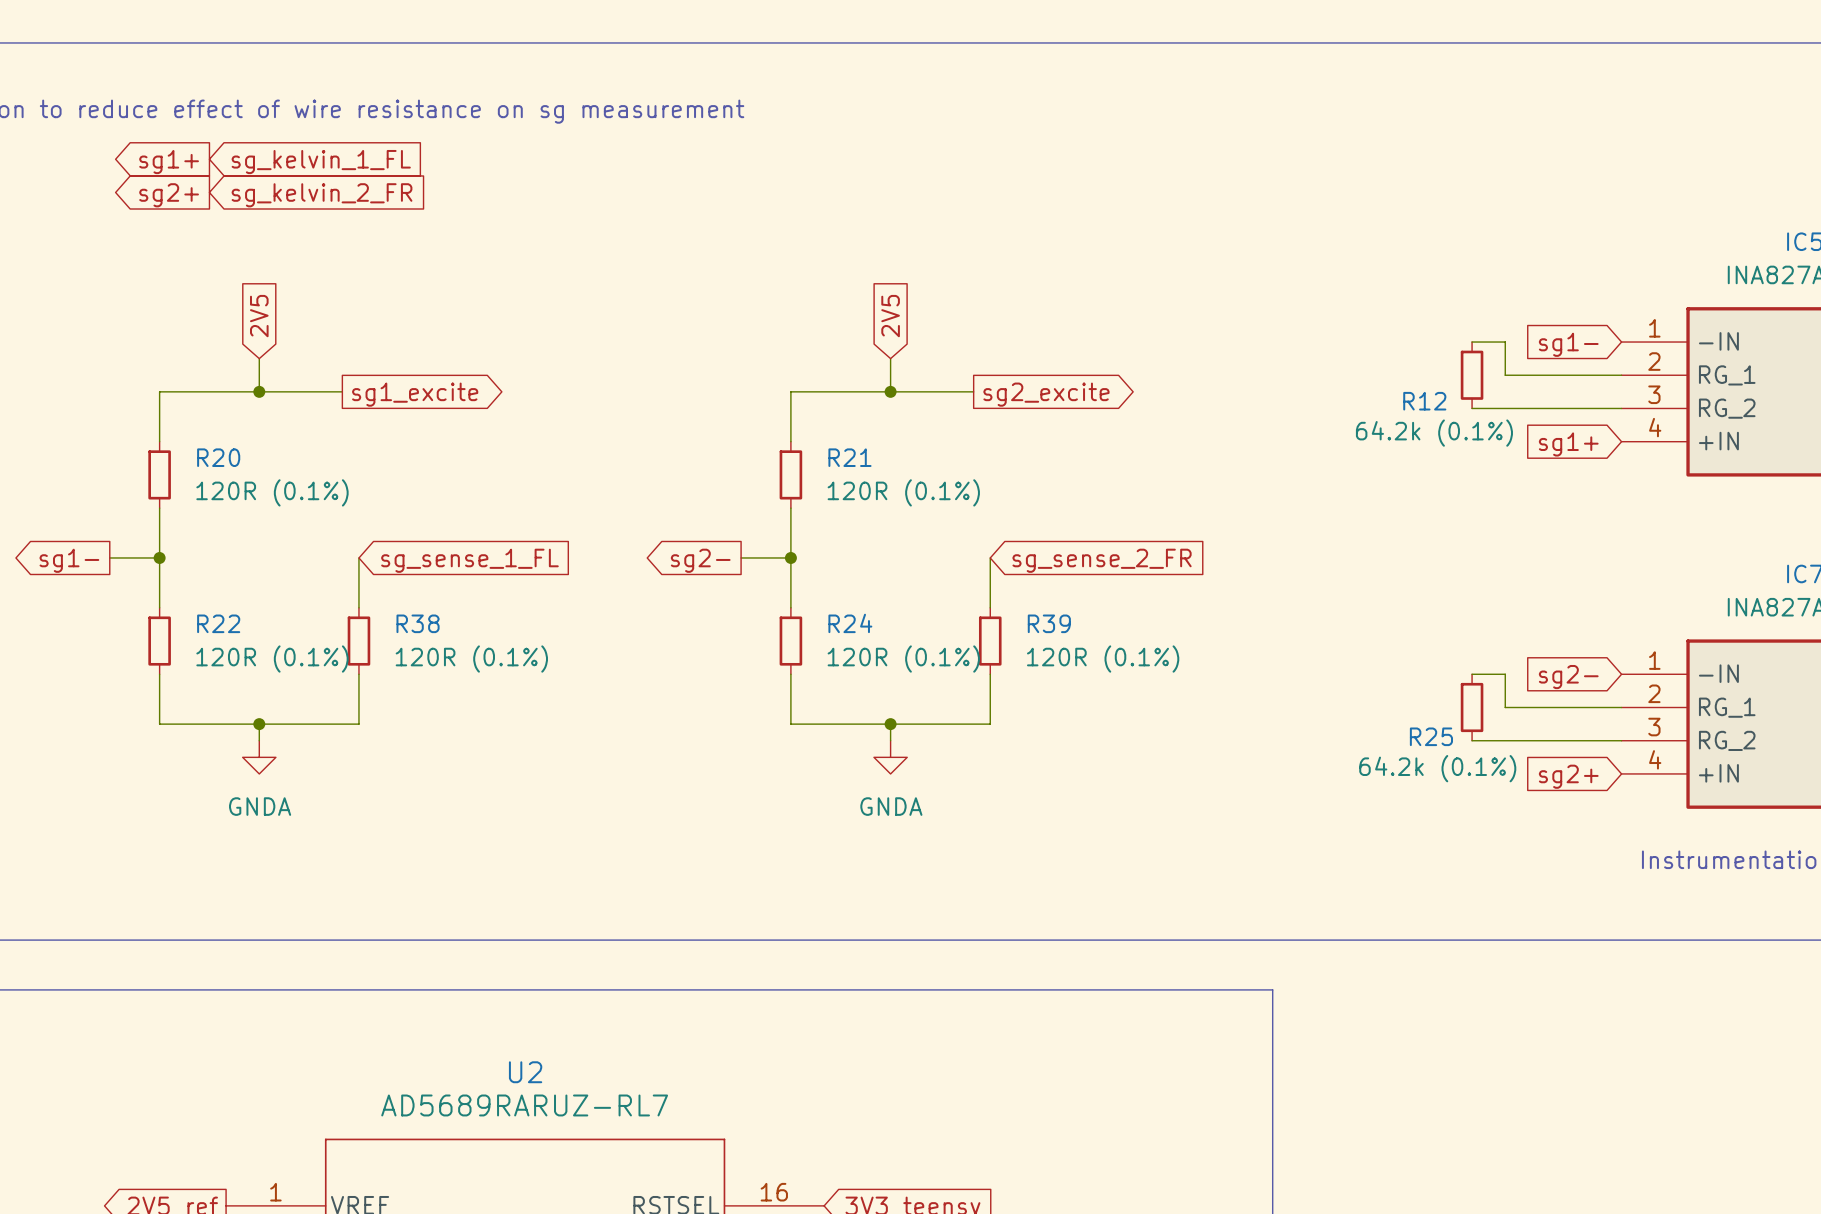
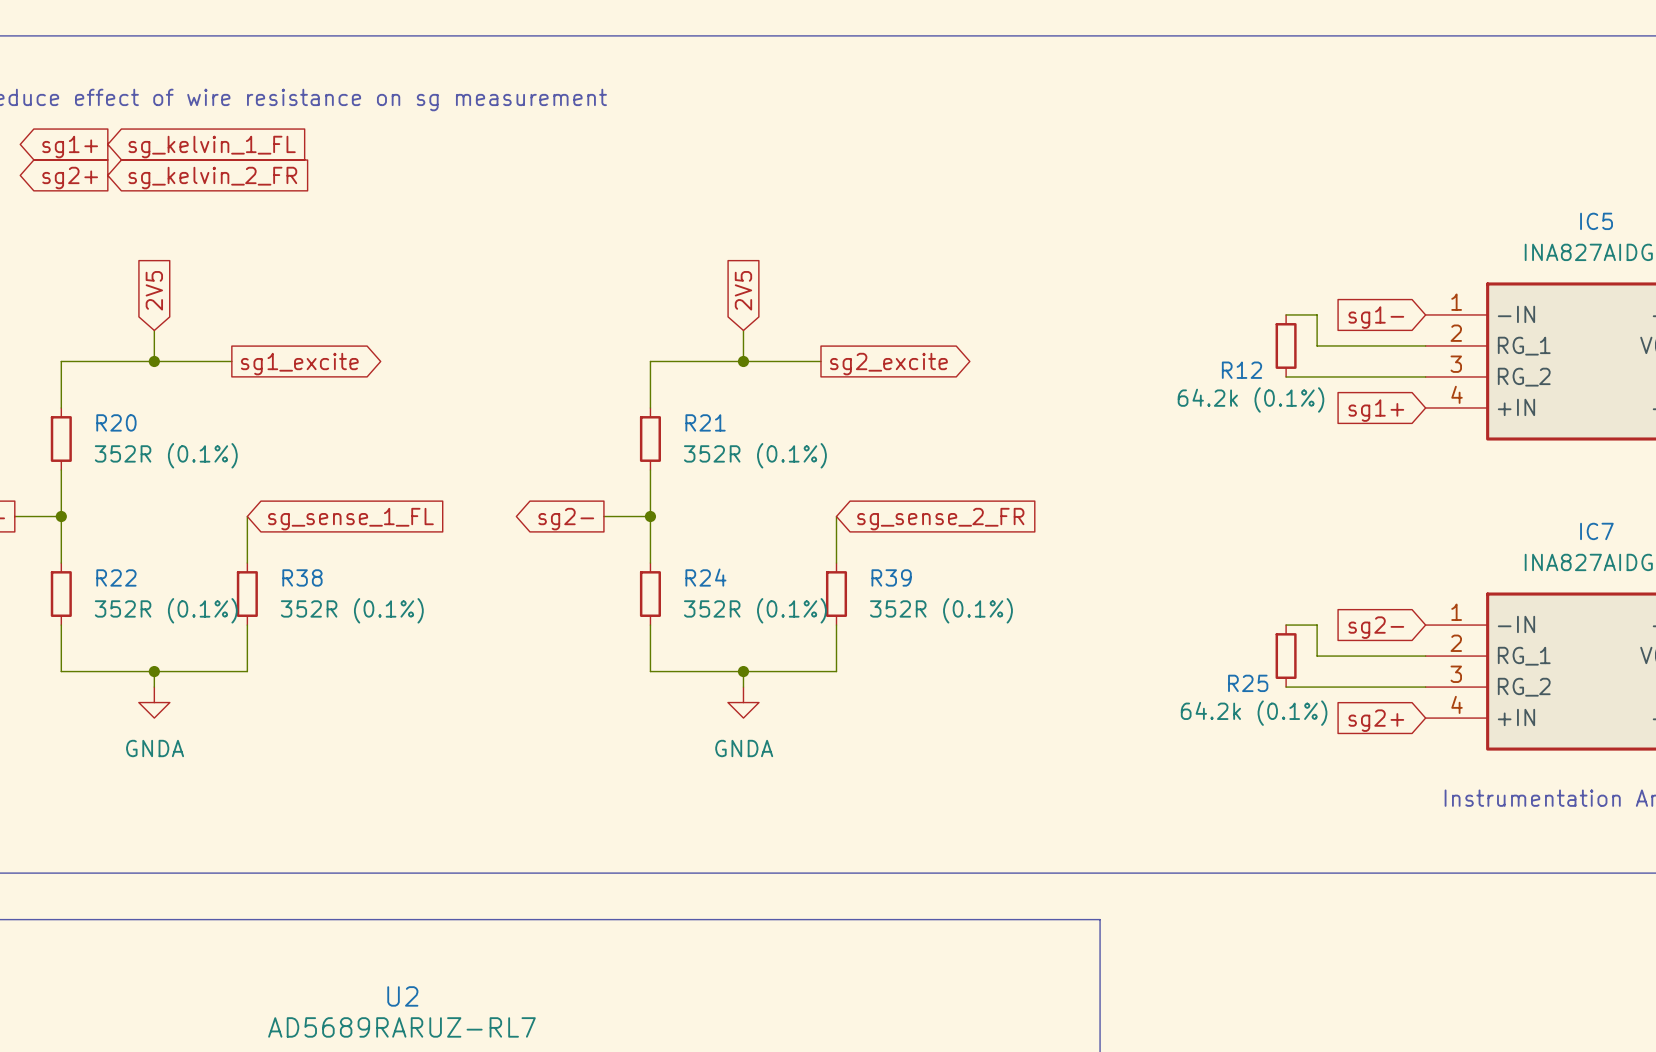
R20 value: 120R (0.1%) (272, 492) -> 352R (0.1%) (166, 455)
R21 value: 120R (0.1%) (903, 492) -> 352R (0.1%) (755, 455)
R22 value: 120R (0.1%) (272, 659) -> 352R (0.1%) (166, 610)
R38 value: 120R (0.1%) (471, 659) -> 352R (0.1%) (352, 610)
R24 value: 120R (0.1%) (903, 659) -> 352R (0.1%) (755, 610)
R39 value: 120R (0.1%) (1103, 659) -> 352R (0.1%) (941, 610)

